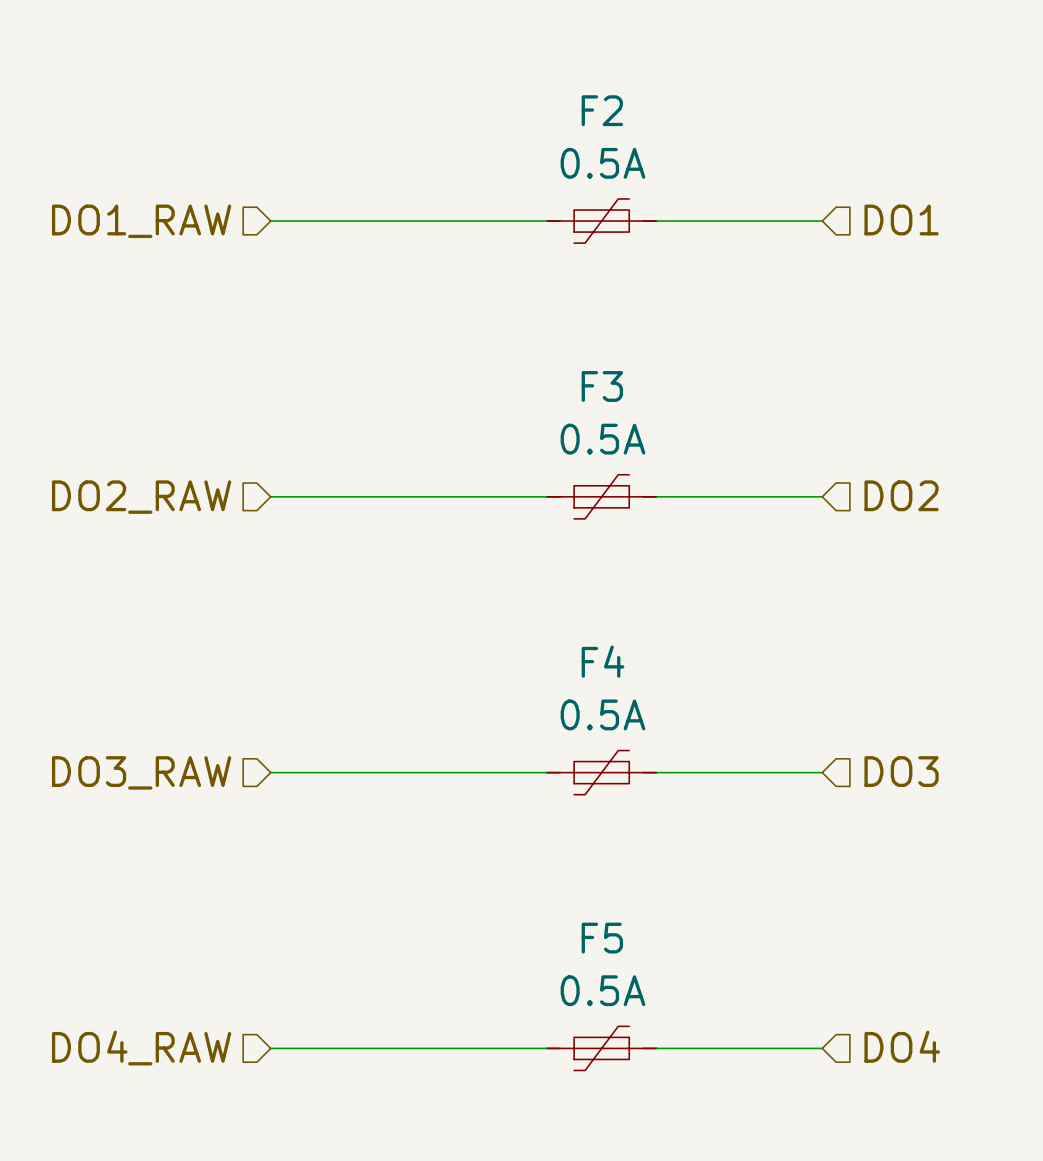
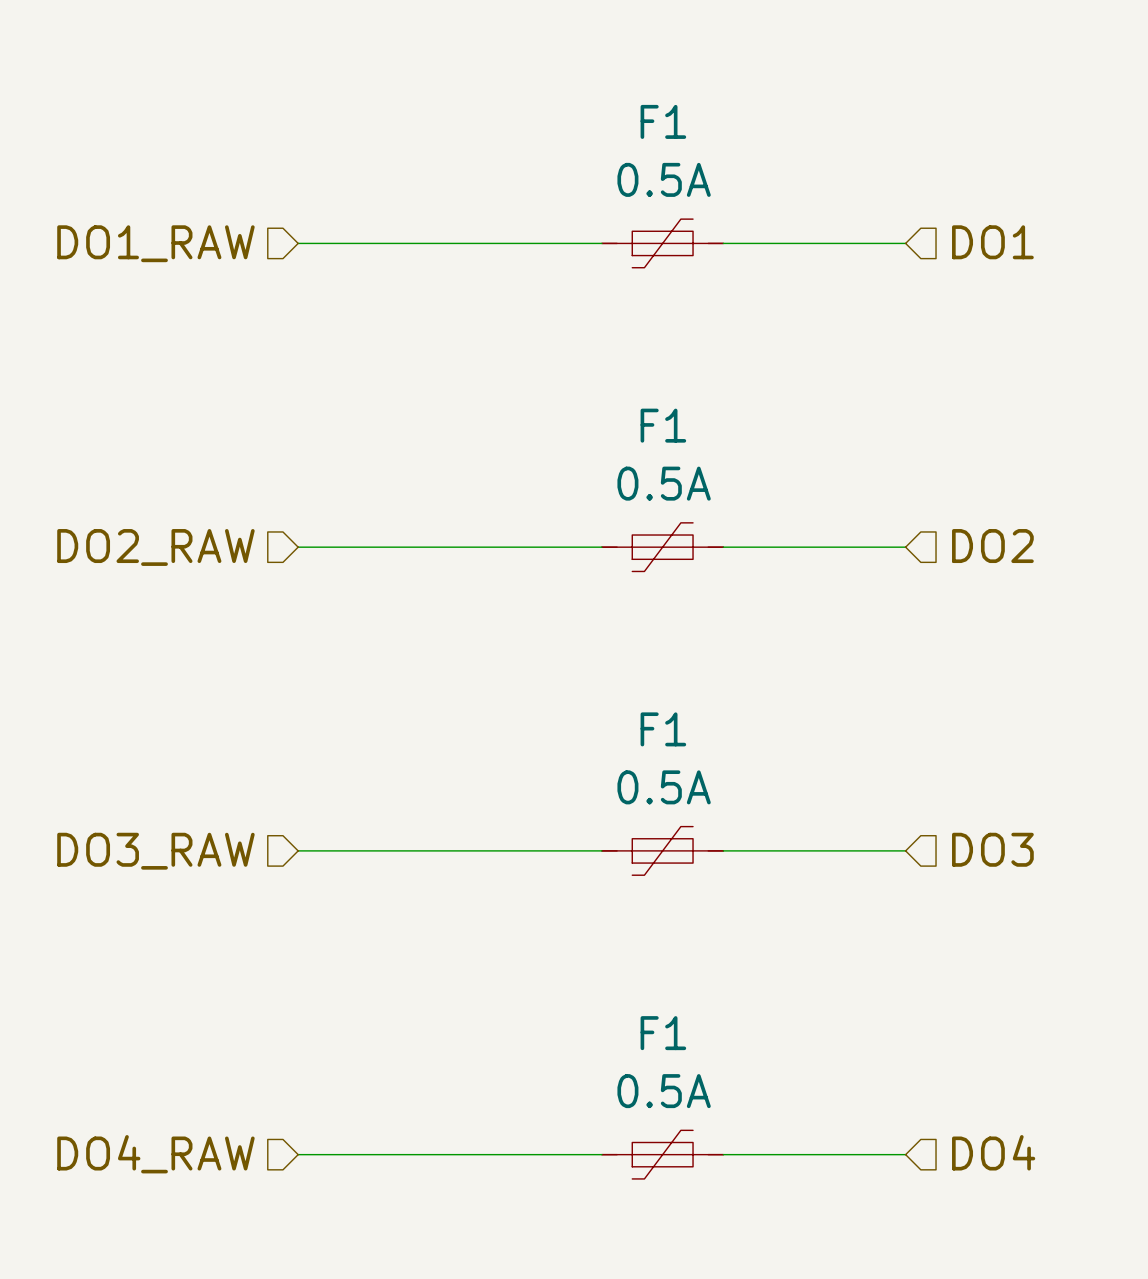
F2 name: F2 (602, 110) -> F1 (663, 121)
F3 name: F3 (602, 386) -> F1 (663, 425)
F4 name: F4 (602, 661) -> F1 (663, 729)
F5 name: F5 (602, 938) -> F1 (663, 1033)

